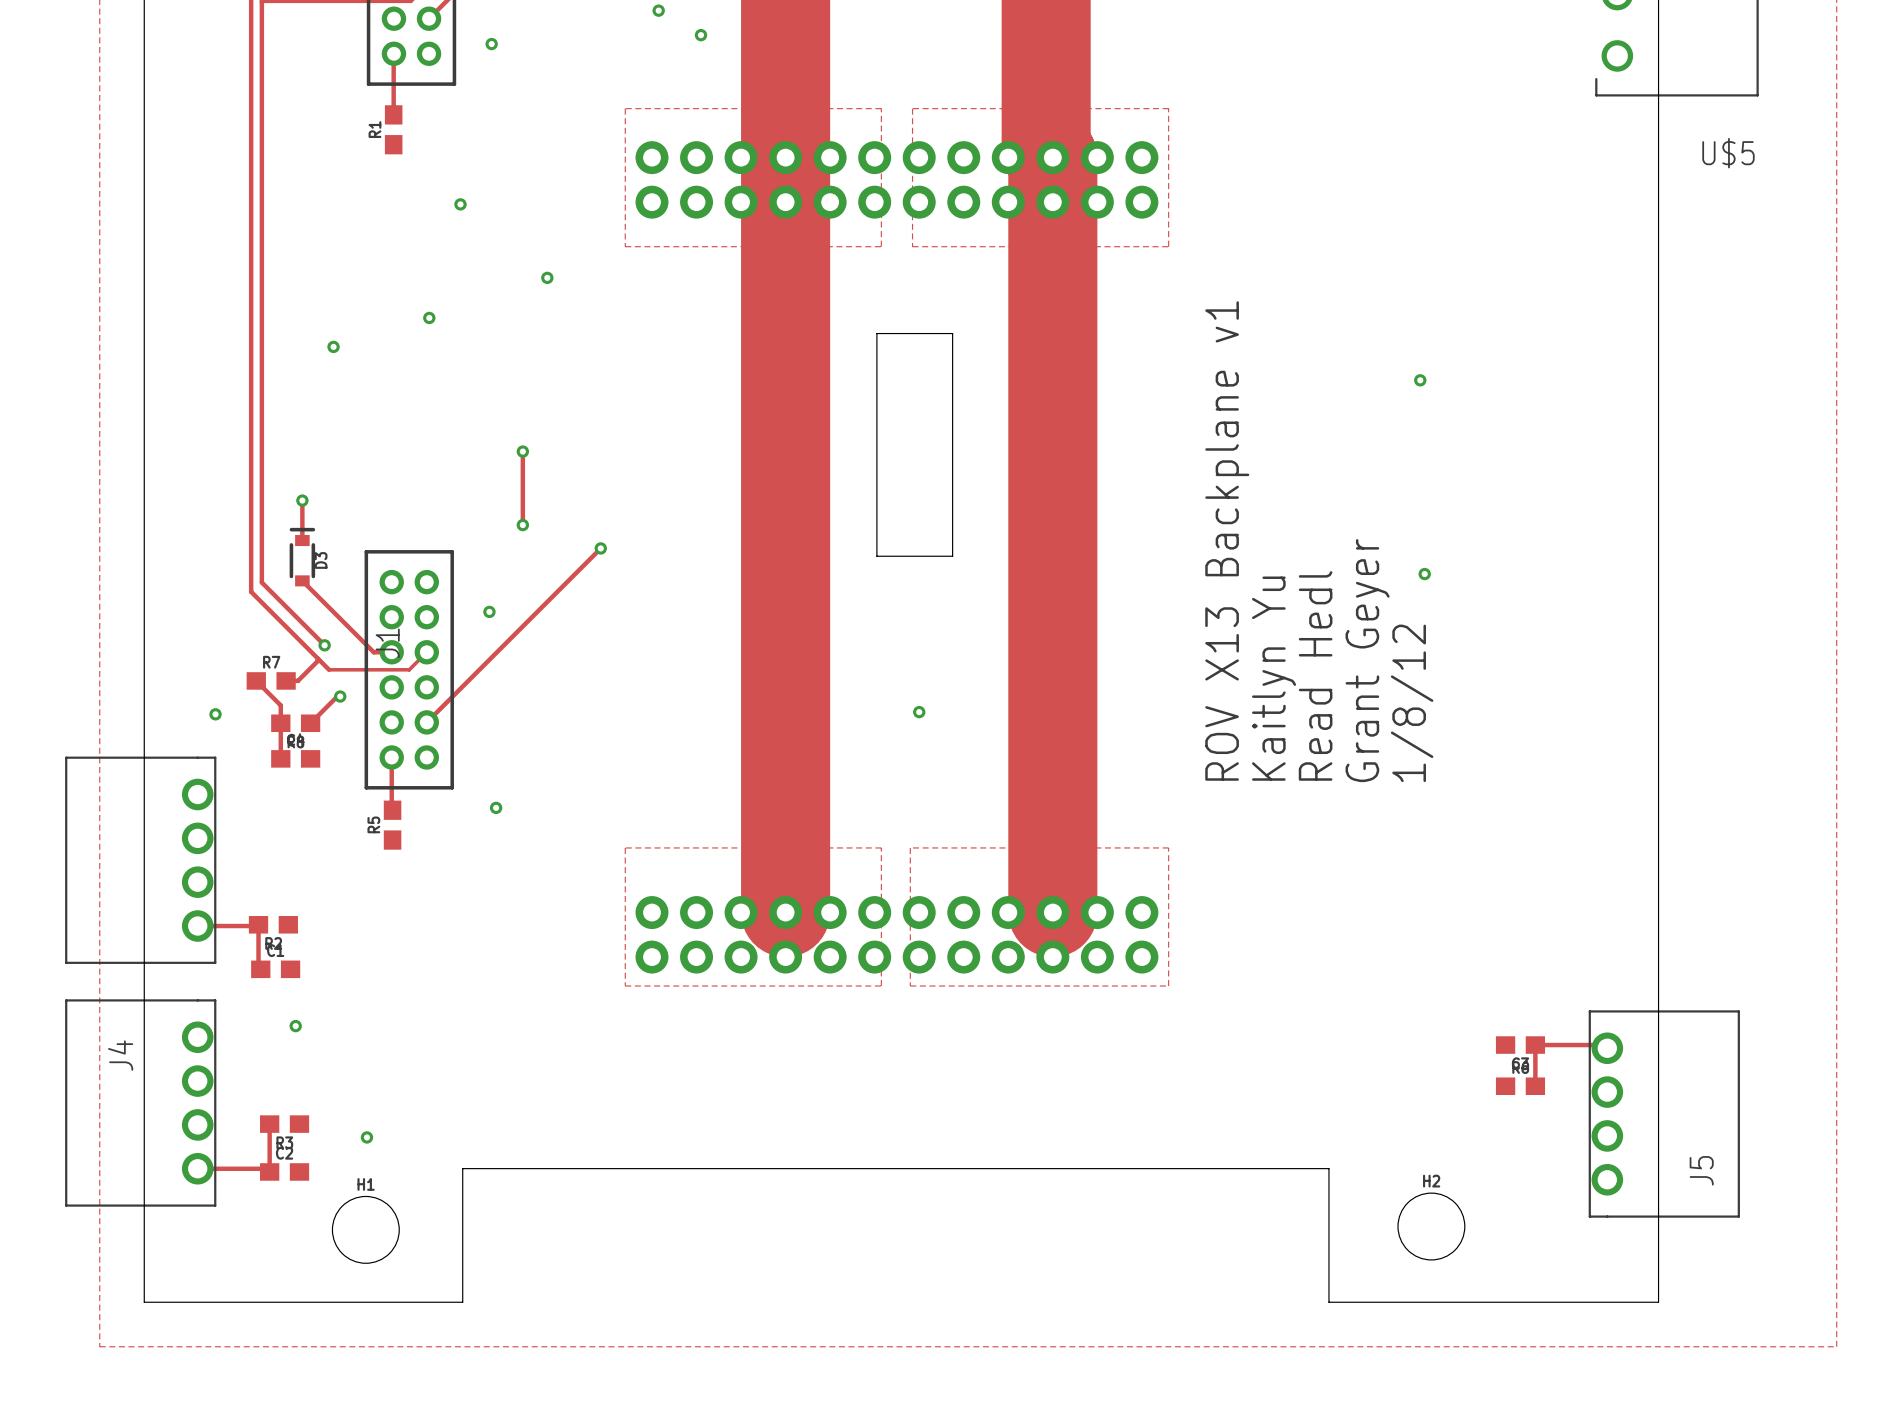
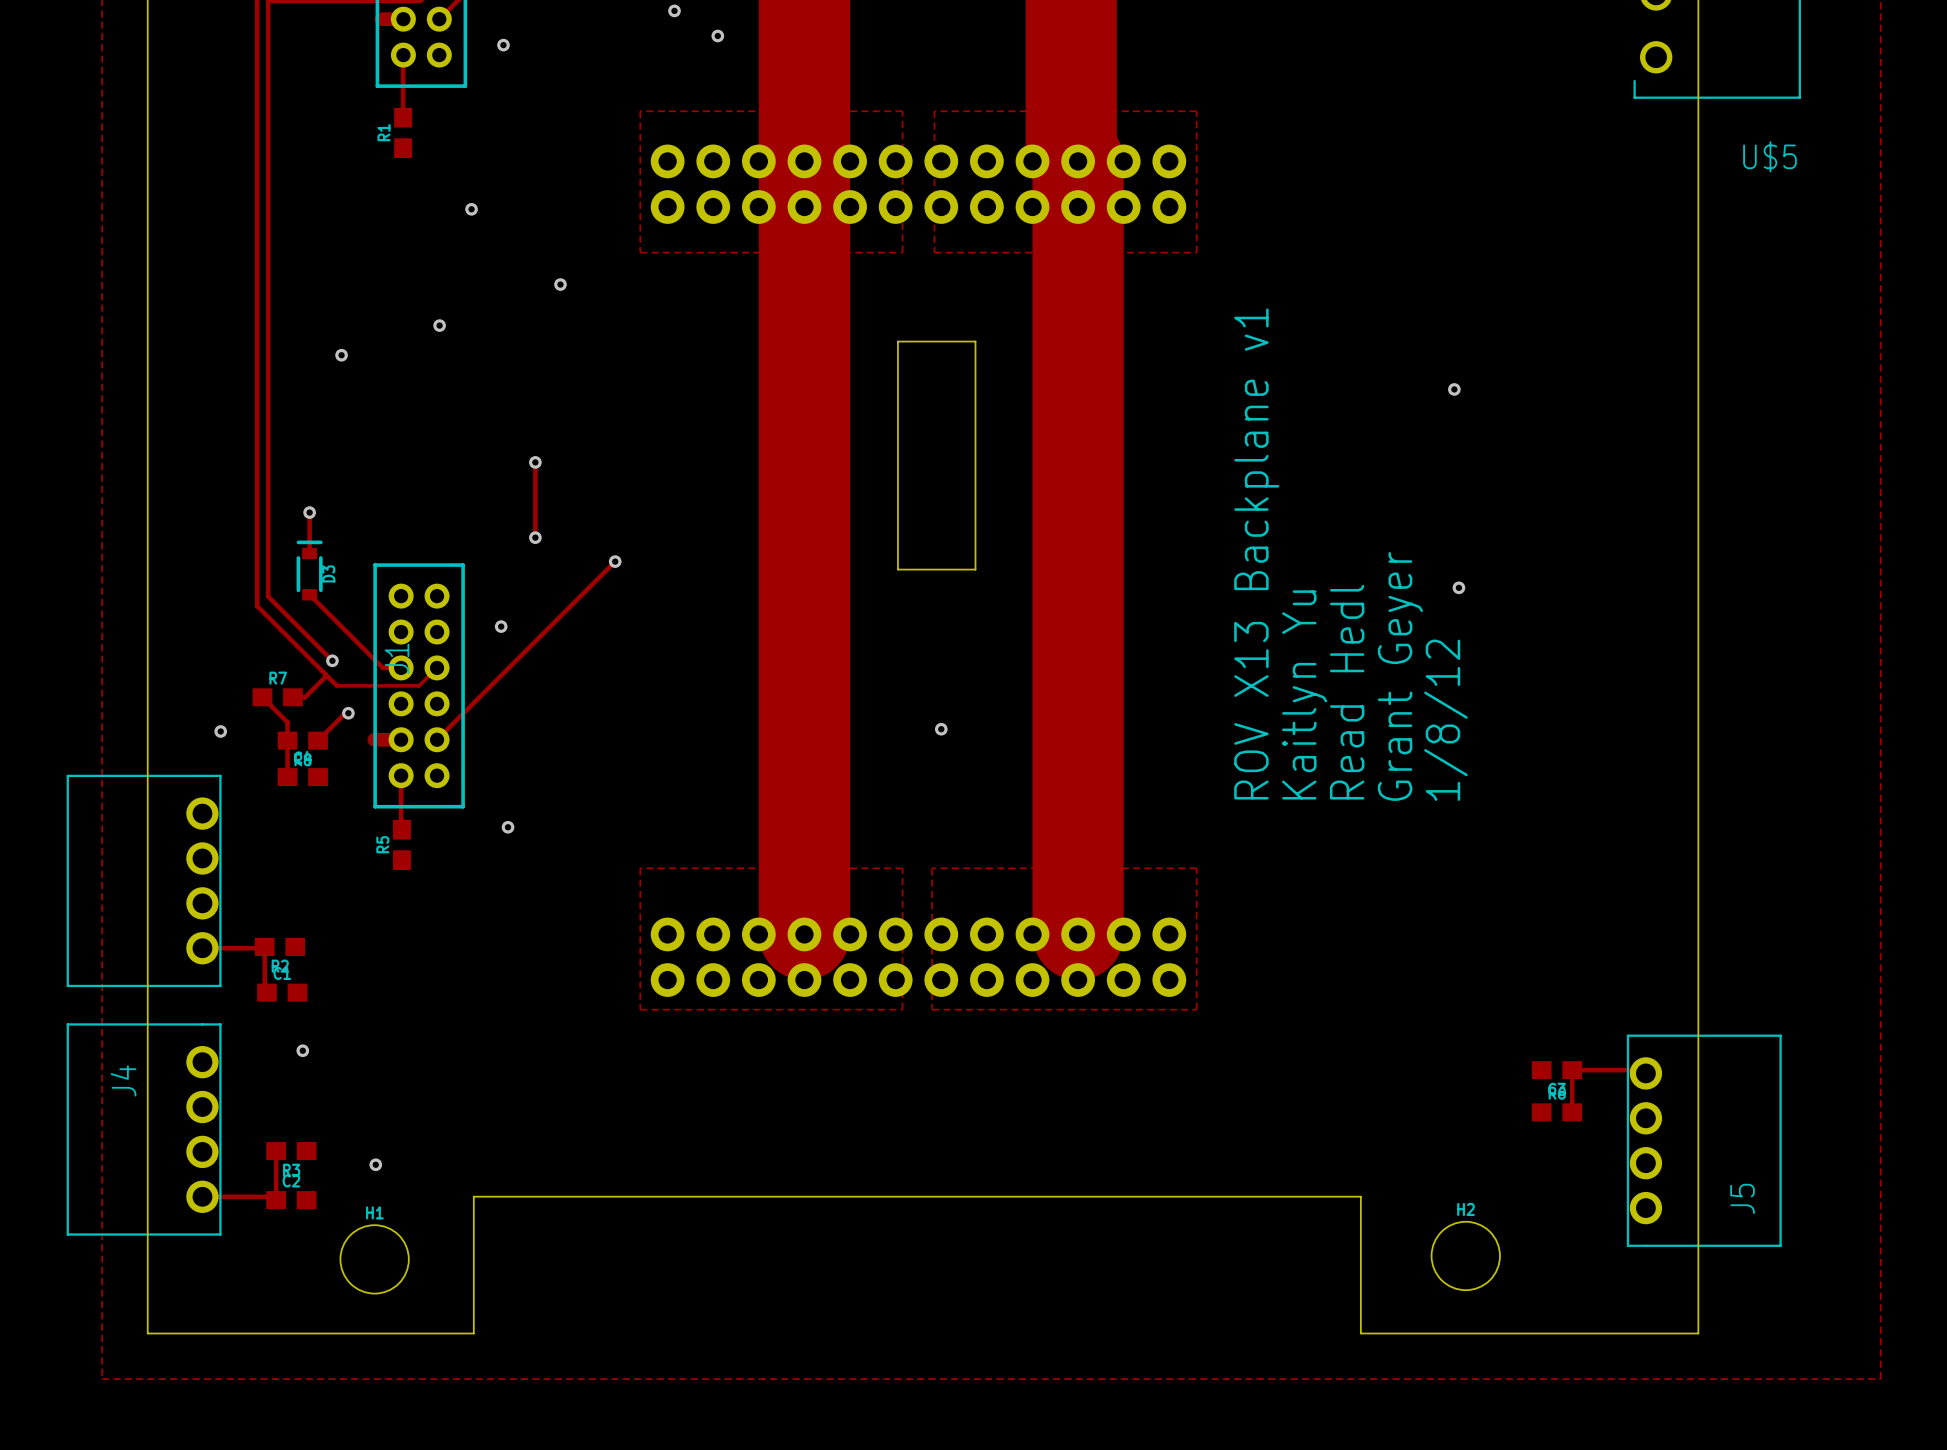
track: none -> (381, 19) (403, 19)
track: none -> (374, 739) (401, 739)

